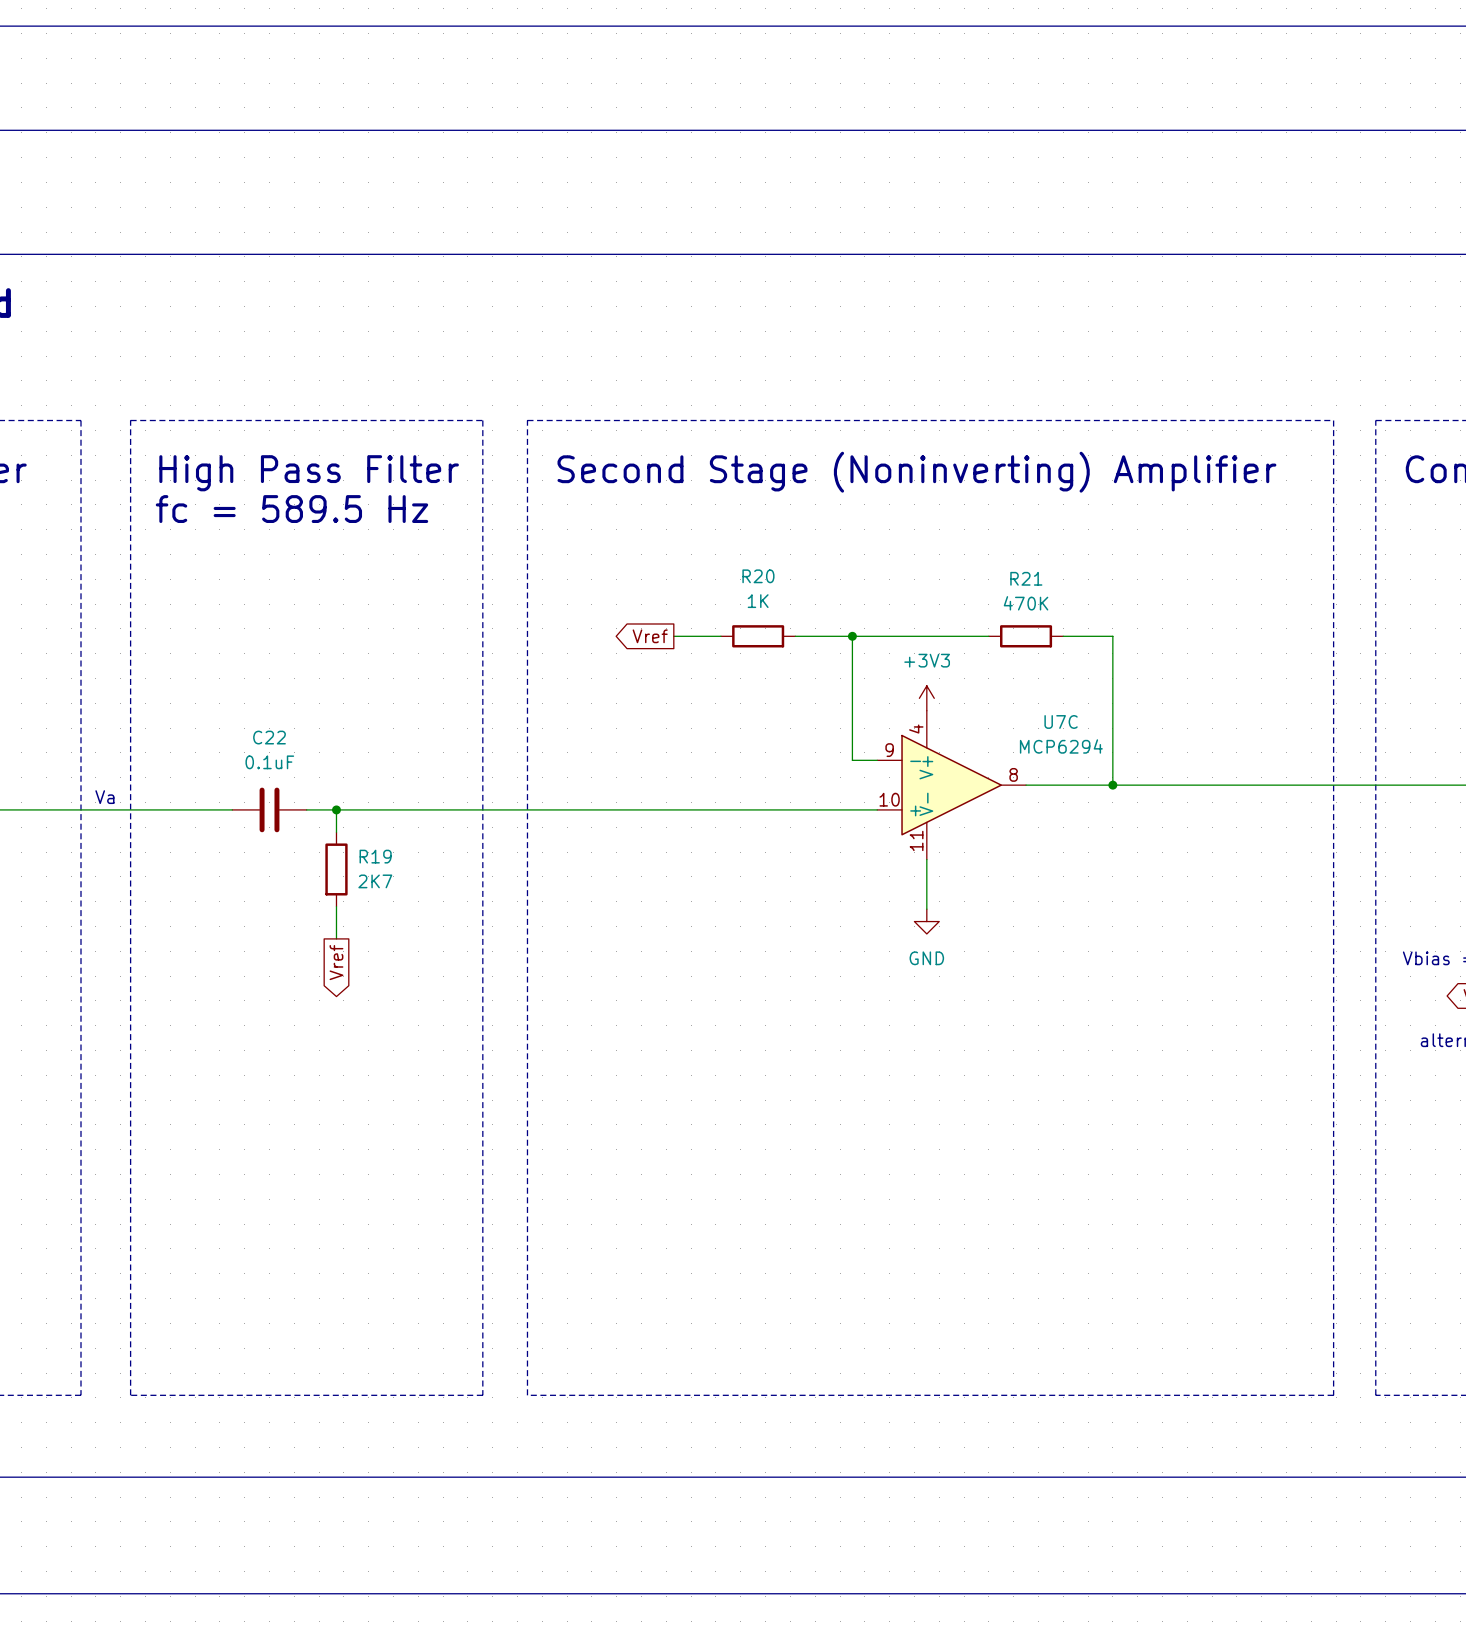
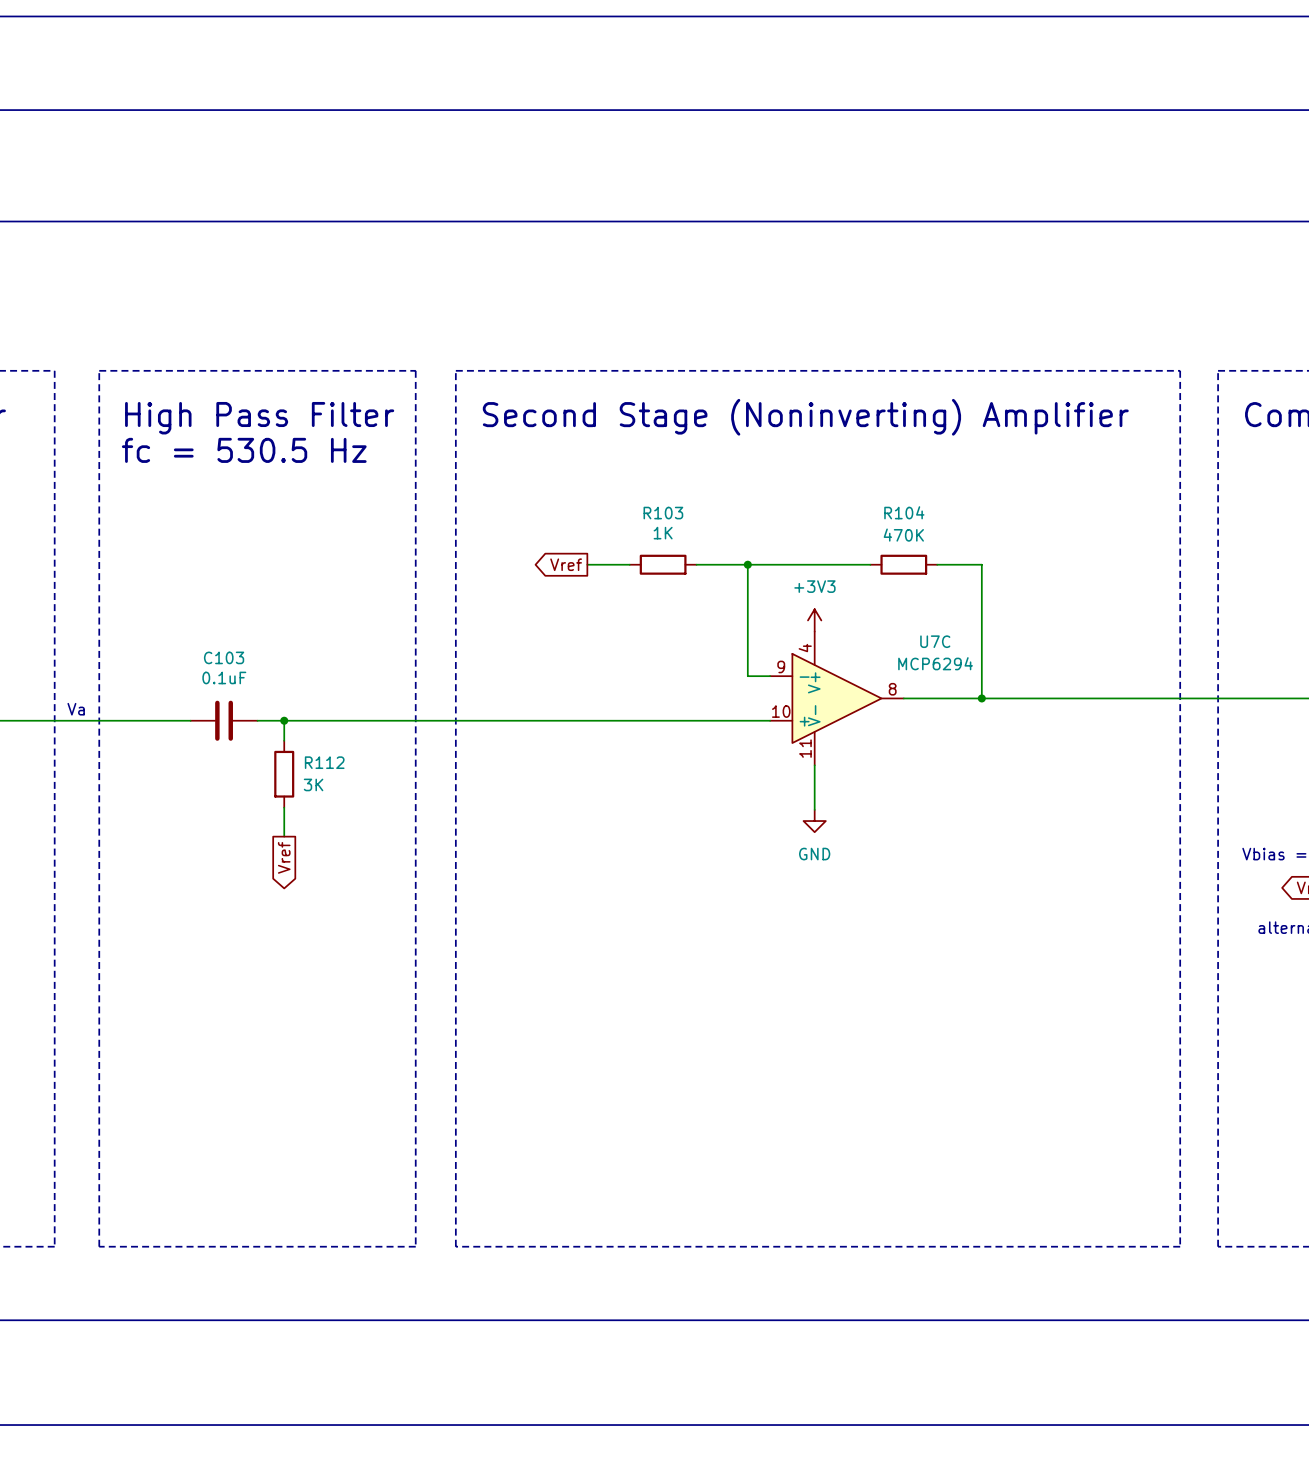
text: fc = 589.5 Hz (291, 509) -> fc = 530.5 Hz (244, 450)
R20 name: R20 (758, 576) -> R103 (663, 513)
R21 name: R21 (1026, 578) -> R104 (904, 512)
C22 name: C22 (269, 737) -> C103 (224, 657)
R19 name: R19 (375, 856) -> R112 (324, 762)
R19 value: 2K7 (375, 881) -> 3K (313, 784)

